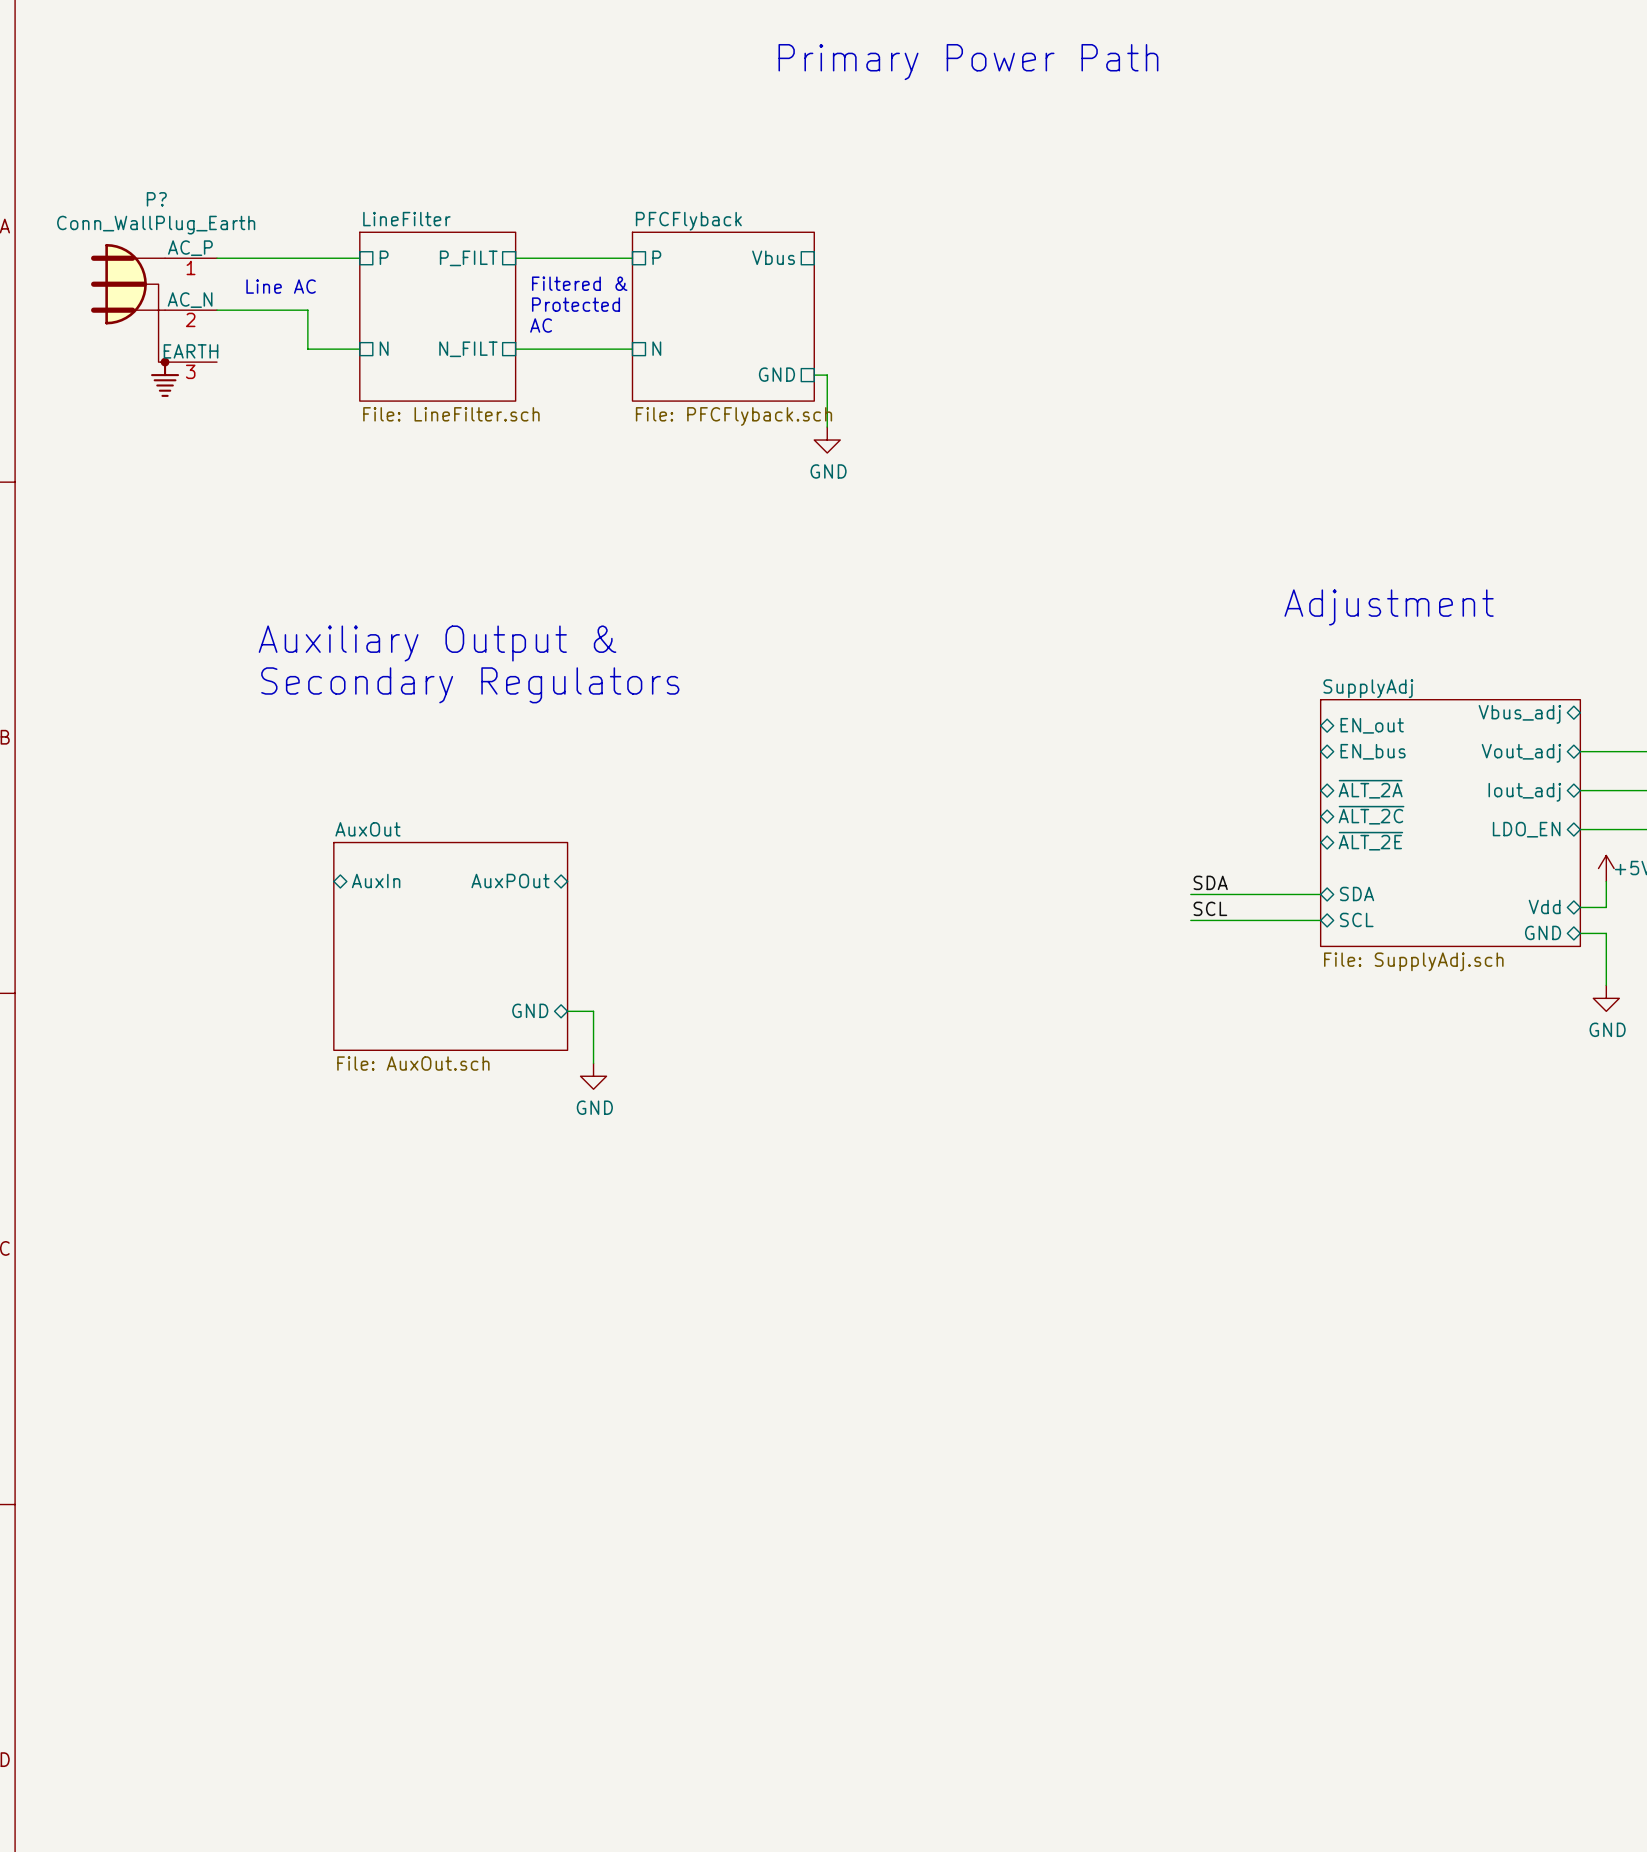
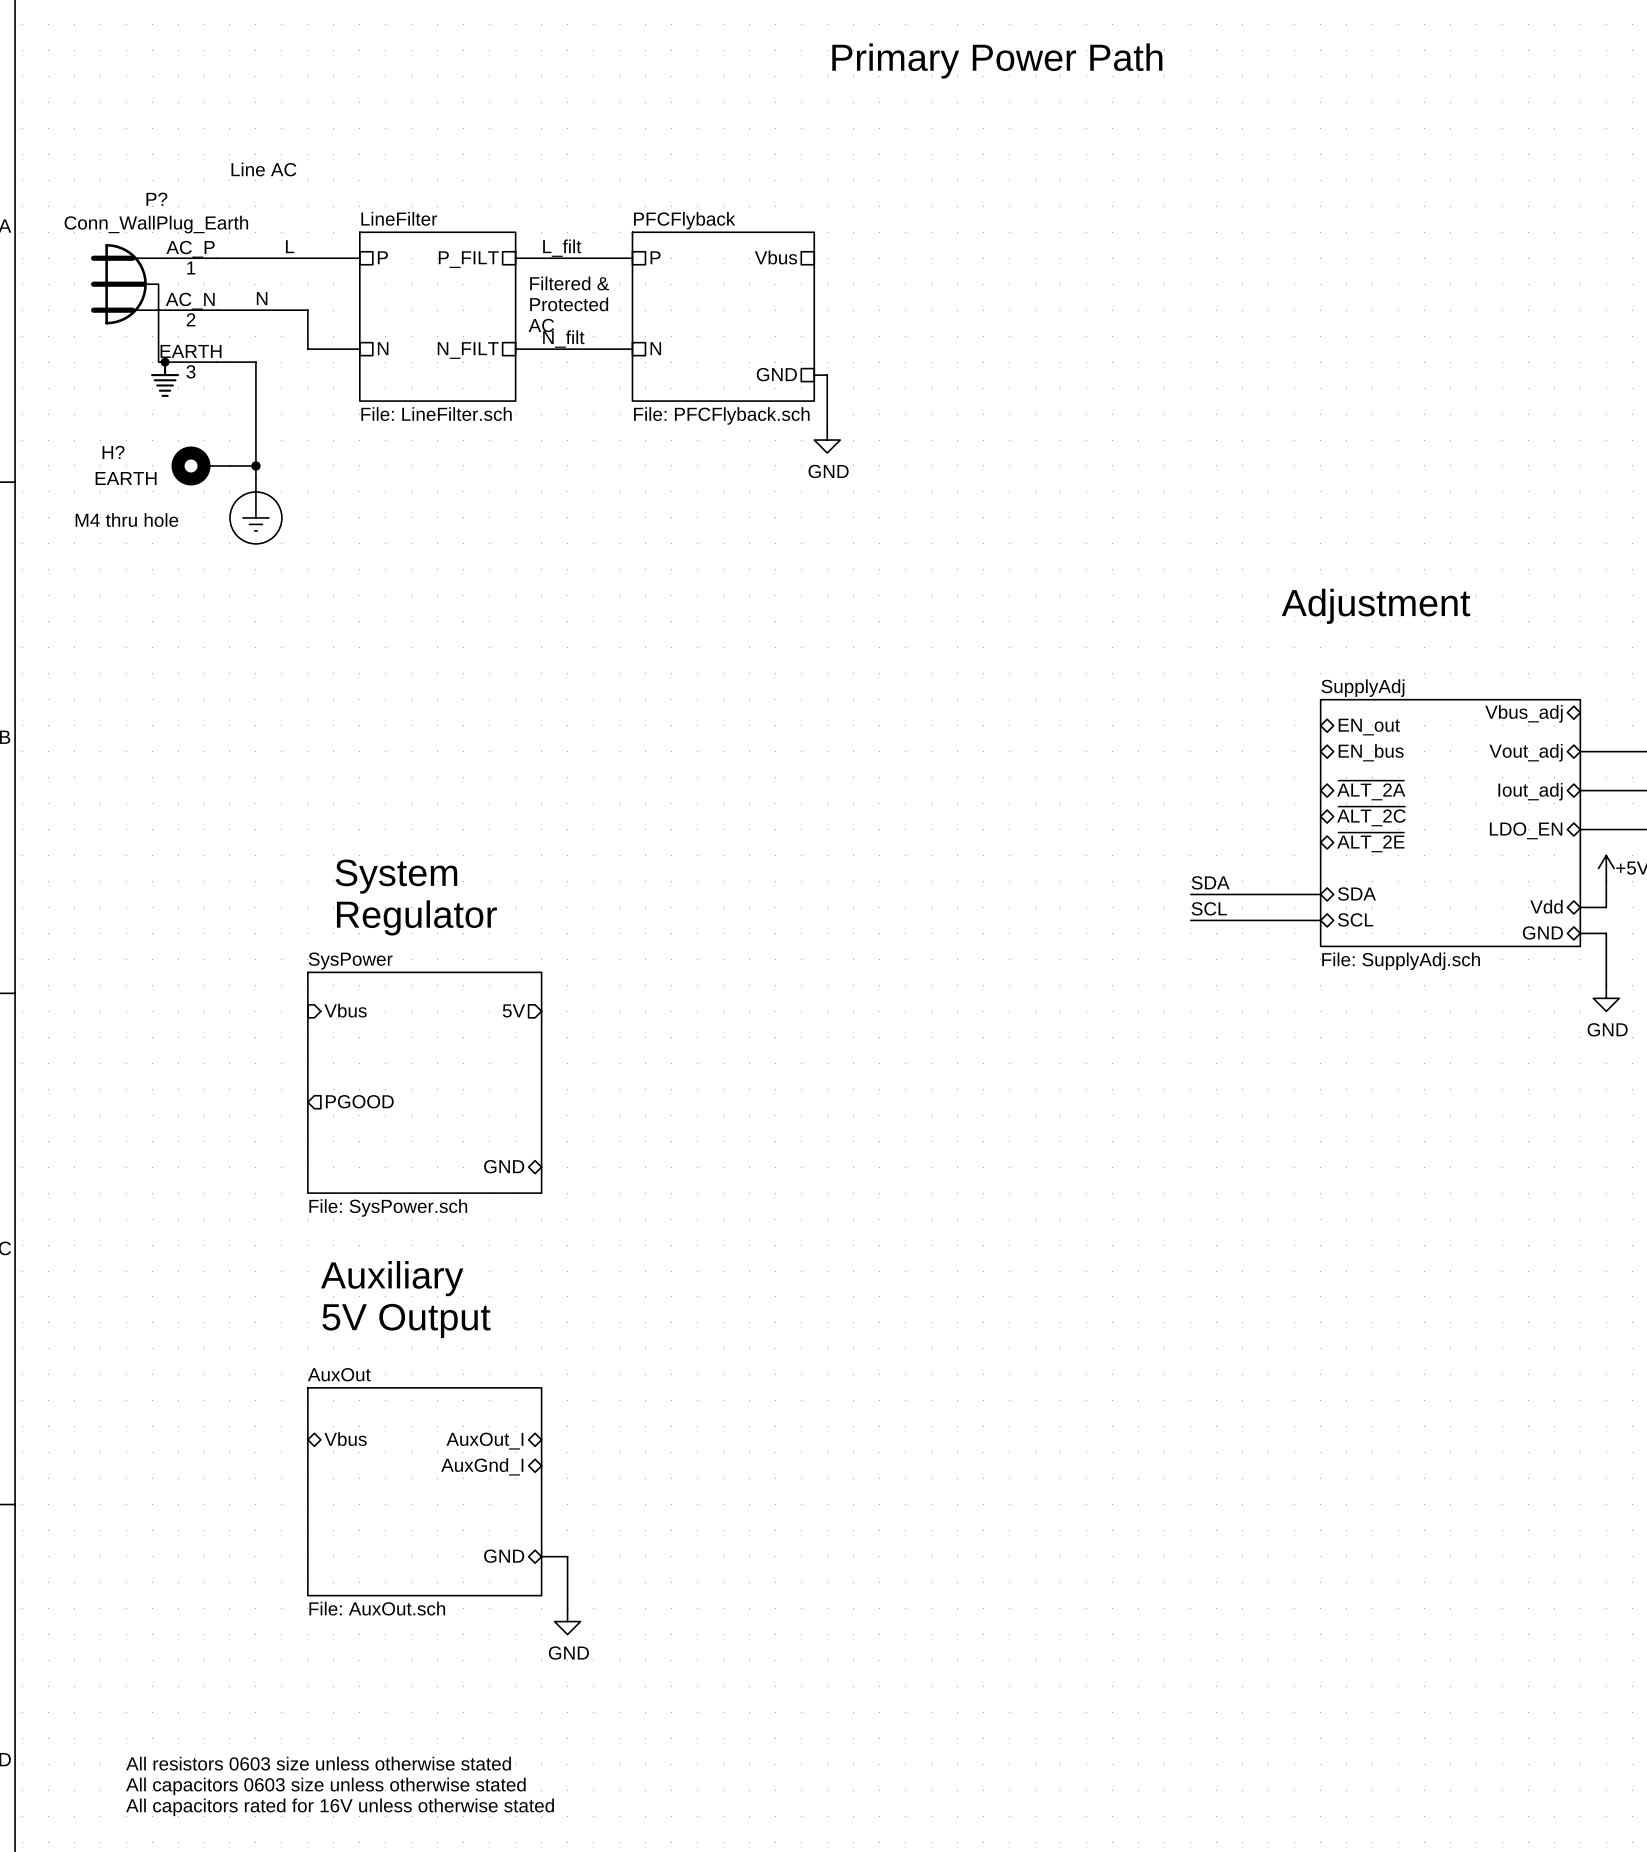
label: none -> L (290, 246)
label: none -> L_filt (562, 248)
text position: Line AC (281, 286) -> Line AC (263, 169)
label: none -> N (262, 298)
label: none -> N_filt (563, 339)
wire: none -> (216, 362) (255, 362) (255, 478)
H?: none -> EARTH (200, 465)
wire: none -> (229, 465) (255, 465)
junction: none -> (255, 465)
power symbol: none -> (255, 511)
text: none -> M4 thru hole (126, 520)
text: Auxiliary Output & (437, 643) -> none
text: Secondary Regulators (470, 685) -> none
text: none -> System (396, 876)
sheet pin: AuxIn (376, 881) -> none
sheet pin: AuxPOut (510, 881) -> none
text: none -> Regulator (416, 917)
sheet AuxOut: File: AuxOut.sch (450, 946) -> none
sheet pin: none -> Vbus (345, 1010)
sheet pin: none -> 5V (513, 1010)
sheet pin position: GND (530, 1010) -> GND (504, 1166)
wire: (567, 1011) (593, 1011) (593, 1063) -> none
power symbol: GND (593, 1076) -> none
sheet SysPower: none -> File: SysPower.sch (424, 1082)
sheet pin: none -> PGOOD (359, 1101)
text: none -> Auxiliary (392, 1278)
text: none -> 5V Output (406, 1320)
sheet pin: none -> Vbus (345, 1439)
sheet pin: none -> AuxOut_I (484, 1441)
sheet pin: none -> AuxGnd_I (482, 1466)
sheet AuxOut: none -> File: AuxOut.sch (424, 1491)
sheet pin: none -> GND (504, 1556)
wire: none -> (541, 1556) (567, 1556) (567, 1608)
power symbol: none -> GND (567, 1621)
text: none -> All resistors 0603 size unless otherwise stated (318, 1763)
text: none -> All capacitors 0603 size unless otherwise stated (325, 1786)
text: none -> All capacitors rated for 16V unless otherwise stated (340, 1807)

